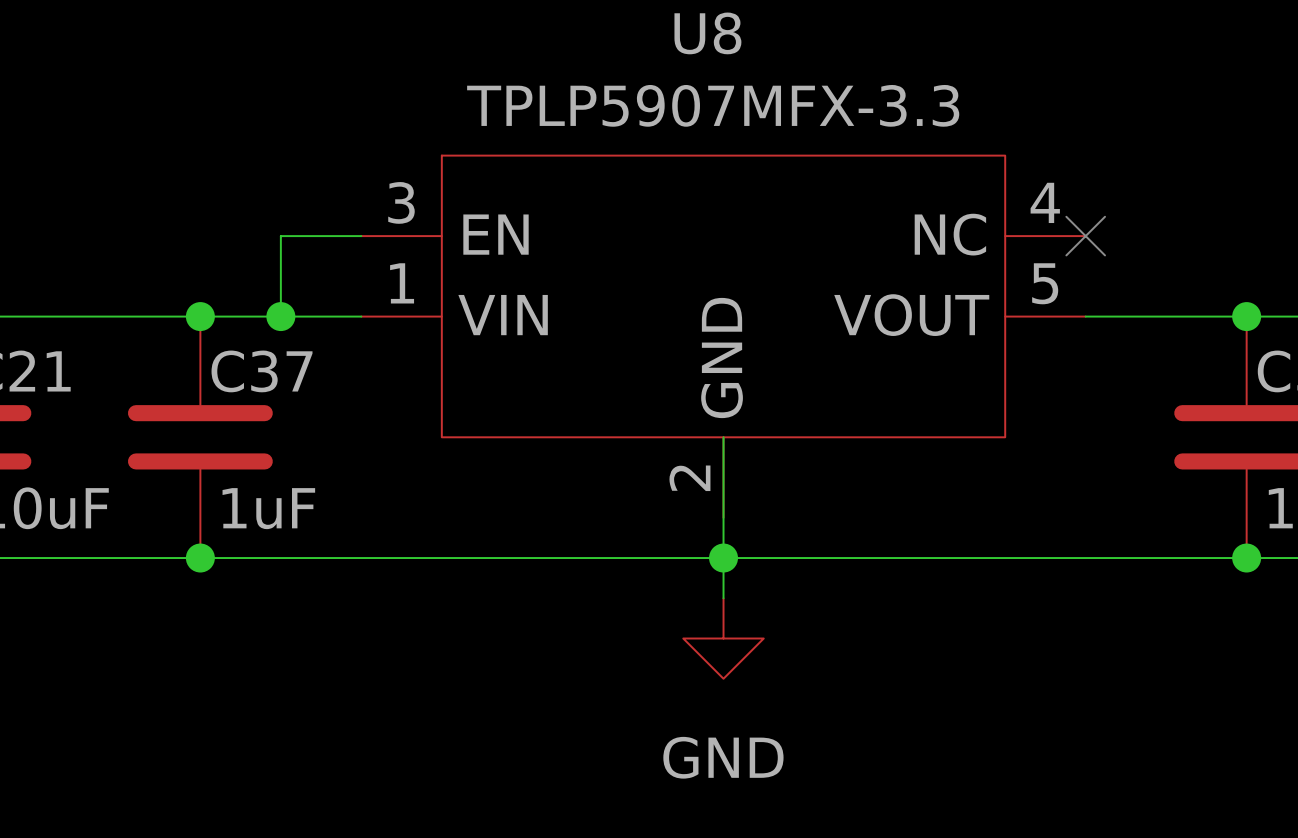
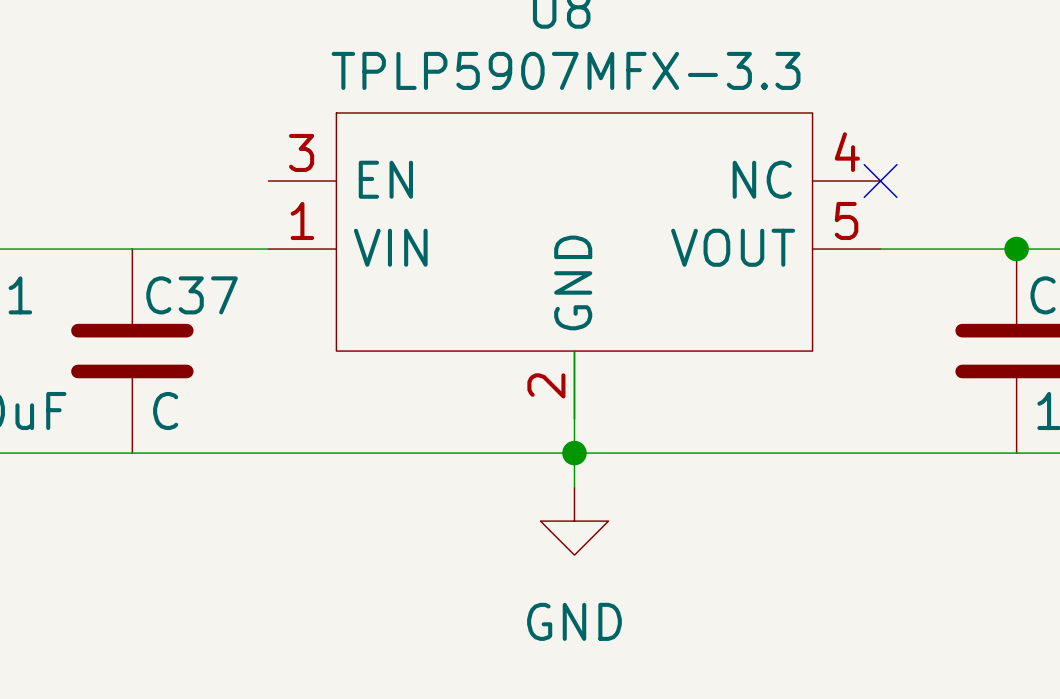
wire: (361, 236) (280, 236) (280, 316) -> none
junction: (200, 316) -> none
junction: (280, 316) -> none
C37 value: 1uF (268, 508) -> C (165, 411)
junction: (200, 558) -> none
junction: (1246, 558) -> none

